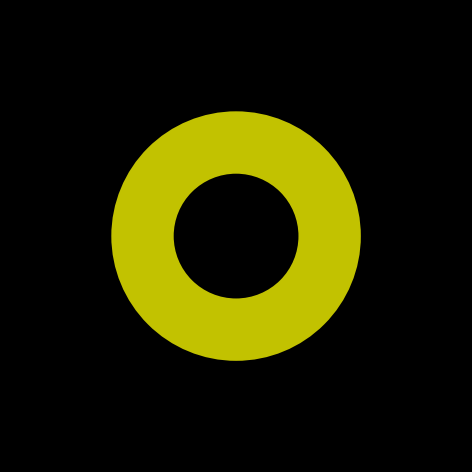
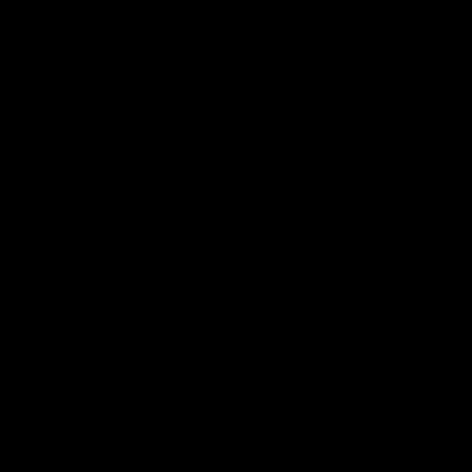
part: (236, 236) -> none

